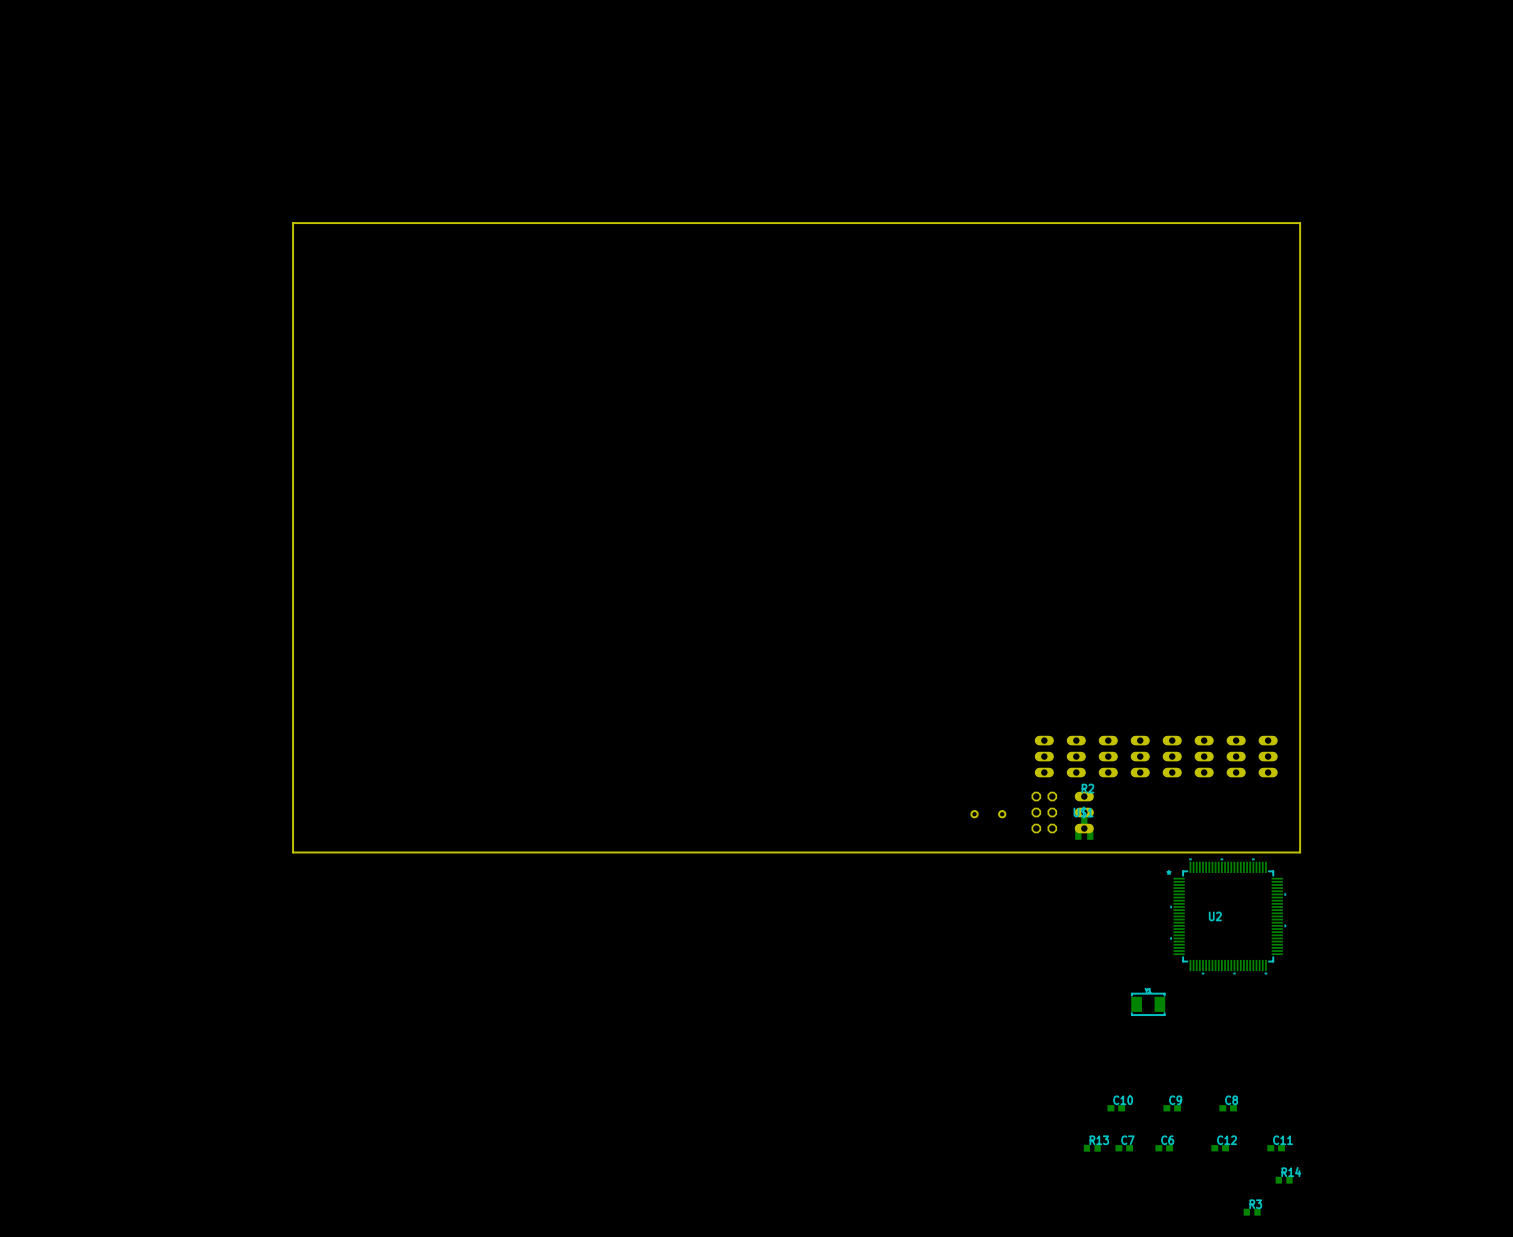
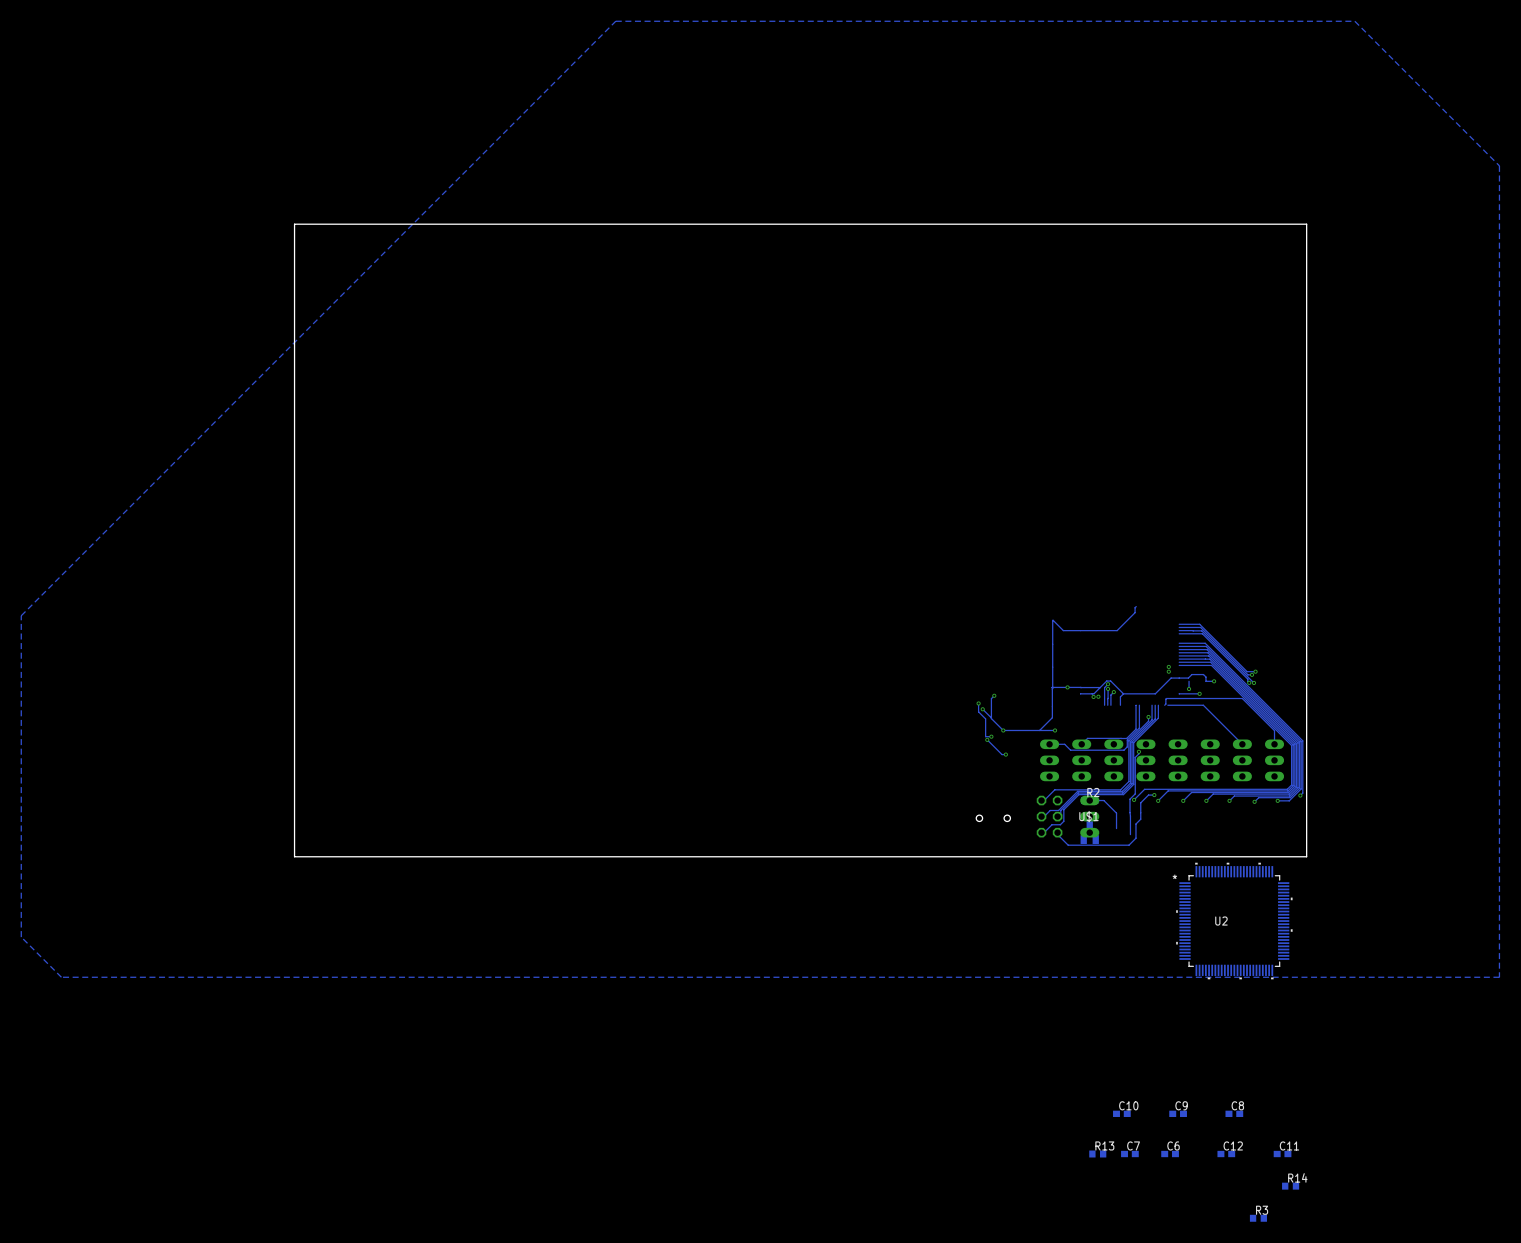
zone outline: none -> (1354, 21) (1499, 165) (1499, 977) (61, 977) (21, 937) (21, 615) (615, 21) (1354, 21)
track: none -> (1136, 606) (1135, 612) (1117, 630) (1063, 630) (1053, 620) (1052, 689)
track: none -> (1179, 624) (1199, 624) (1247, 671) (1255, 671)
track: none -> (1179, 627) (1200, 627) (1247, 674) (1252, 674)
track: none -> (1179, 630) (1201, 630) (1254, 682)
track: none -> (1179, 633) (1202, 633) (1249, 682)
track: none -> (1179, 643) (1205, 643) (1302, 740) (1302, 793) (1300, 795)
track: none -> (1179, 646) (1206, 646) (1301, 741) (1301, 788) (1289, 800) (1277, 800)
track: none -> (1179, 649) (1207, 649) (1299, 742) (1299, 788) (1290, 797) (1258, 797) (1254, 801)
track: none -> (1179, 652) (1207, 652) (1298, 742) (1298, 787) (1289, 796) (1234, 796) (1229, 800)
track: none -> (1179, 655) (1208, 655) (1296, 743) (1296, 786) (1289, 794) (1213, 794) (1206, 800)
track: none -> (1205, 659) (1179, 659)
track: none -> (1205, 659) (1209, 659) (1294, 744) (1294, 786) (1288, 792) (1191, 792) (1183, 800)
track: none -> (1179, 662) (1210, 662) (1293, 744) (1293, 785) (1287, 790) (1168, 790) (1158, 800)
track: none -> (1179, 665) (1211, 665) (1291, 745) (1291, 784) (1287, 789) (1144, 789) (1134, 799)
via: none -> (1168, 666)
via: none -> (1168, 671)
via: none -> (1255, 671)
via: none -> (1252, 674)
track: none -> (1189, 681) (1189, 689)
track: none -> (1214, 681) (1205, 681) (1203, 674) (1191, 674) (1188, 678) (1171, 678) (1155, 693) (1123, 693)
via: none -> (1214, 681)
via: none -> (1249, 682)
via: none -> (1254, 682)
track: none -> (1108, 684) (1104, 687) (1104, 705)
via: none -> (1108, 684)
via: none -> (1067, 687)
track: none -> (1081, 687) (1052, 687) (1052, 717) (1039, 730)
track: none -> (1100, 687) (1080, 687)
track: none -> (1108, 688) (1107, 705)
via: none -> (1108, 688)
via: none -> (1189, 689)
track: none -> (1113, 692) (1110, 695) (1110, 705)
via: none -> (1113, 692)
track: none -> (1092, 693) (1106, 681) (1110, 681) (1123, 693)
track: none -> (1092, 693) (1080, 693)
track: none -> (1123, 693) (1120, 696) (1120, 705)
track: none -> (1199, 693) (1179, 693)
via: none -> (1199, 693)
track: none -> (994, 695) (991, 698) (991, 718) (1003, 730) (1055, 730)
via: none -> (994, 695)
via: none -> (1093, 696)
via: none -> (1098, 696)
track: none -> (978, 703) (978, 711) (985, 718) (985, 736) (991, 736)
via: none -> (978, 703)
track: none -> (1136, 705) (1136, 729) (1126, 738) (1087, 738) (1081, 744)
track: none -> (1139, 705) (1139, 728) (1127, 740) (1127, 746) (1123, 750) (1070, 750) (1064, 744) (1049, 744)
track: none -> (1152, 705) (1152, 719) (1130, 741) (1130, 783) (1122, 791) (1077, 791) (1058, 810) (1050, 810) (1041, 818)
track: none -> (1155, 705) (1155, 718) (1132, 742) (1132, 783) (1122, 793) (1078, 793) (1060, 810) (1060, 815) (1057, 818)
track: none -> (1158, 705) (1158, 718) (1133, 742) (1133, 784) (1123, 794) (1078, 794) (1063, 809) (1063, 821) (1060, 824) (1052, 824) (1041, 834)
track: none -> (1164, 705) (1166, 698) (1242, 698) (1274, 730) (1274, 744)
track: none -> (1167, 705) (1203, 705) (1242, 744)
track: none -> (982, 709) (991, 717)
via: none -> (982, 709)
track: none -> (1148, 716) (1148, 721) (1128, 740) (1128, 781) (1120, 789) (1054, 789) (1041, 802)
via: none -> (1148, 716)
via: none -> (1003, 730)
via: none -> (1055, 730)
via: none -> (991, 736)
track: none -> (987, 739) (1002, 754) (1005, 754)
via: none -> (987, 739)
track: none -> (1138, 751) (1135, 757) (1135, 793) (1129, 799) (1130, 834)
via: none -> (1138, 751)
via: none -> (1005, 754)
track: none -> (1154, 795) (1148, 795) (1140, 802) (1140, 819) (1135, 823) (1135, 838) (1129, 845) (1068, 845) (1057, 834)
via: none -> (1154, 795)
via: none -> (1300, 795)
via: none -> (1134, 799)
track: none -> (1089, 800) (1103, 800) (1116, 813) (1116, 828)
via: none -> (1158, 800)
via: none -> (1183, 800)
via: none -> (1206, 800)
via: none -> (1229, 800)
via: none -> (1277, 800)
via: none -> (1254, 801)
part: (1148, 1004) -> none

